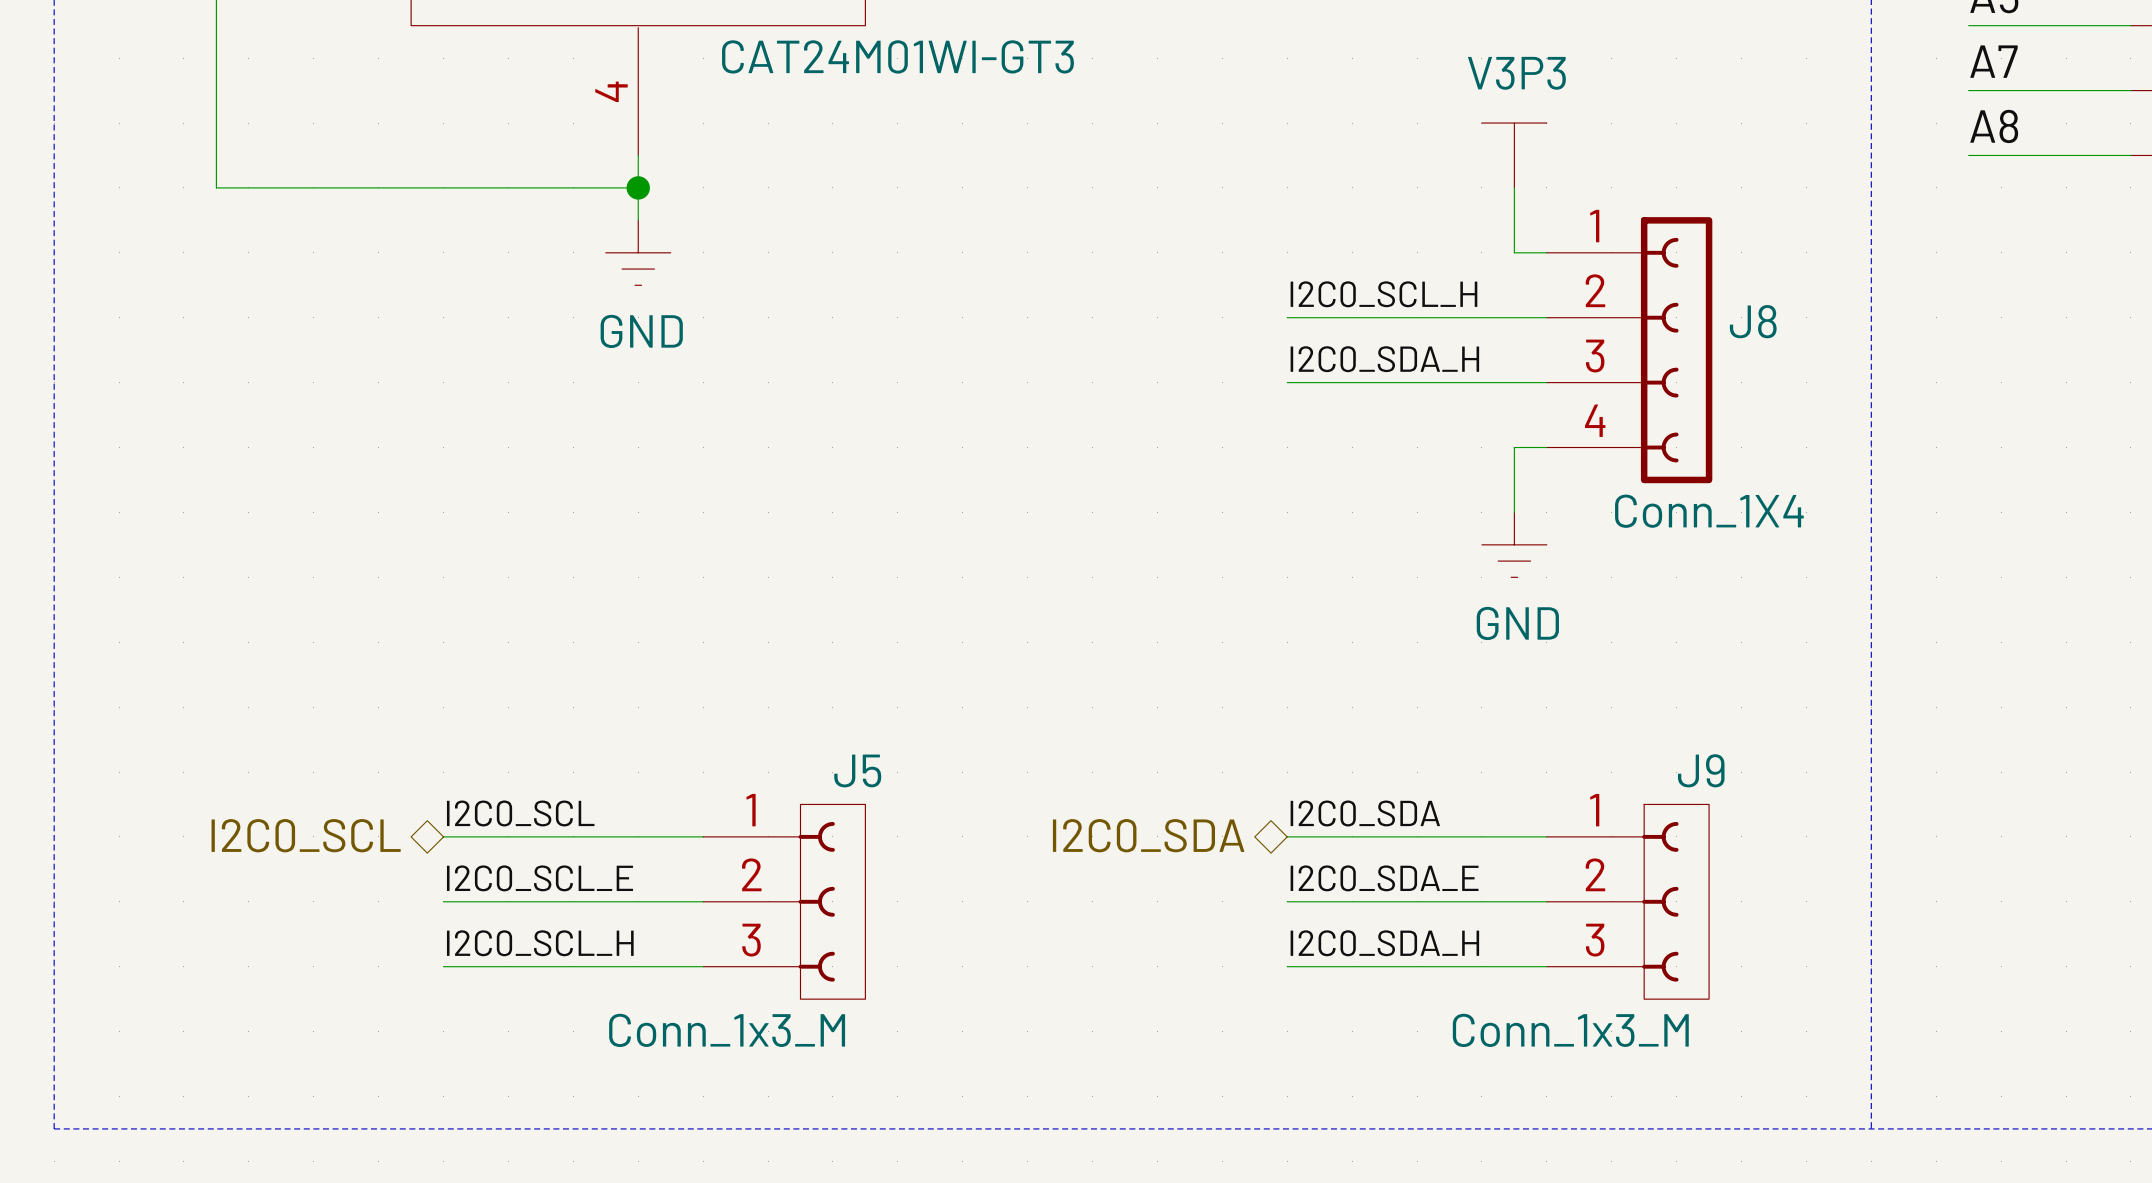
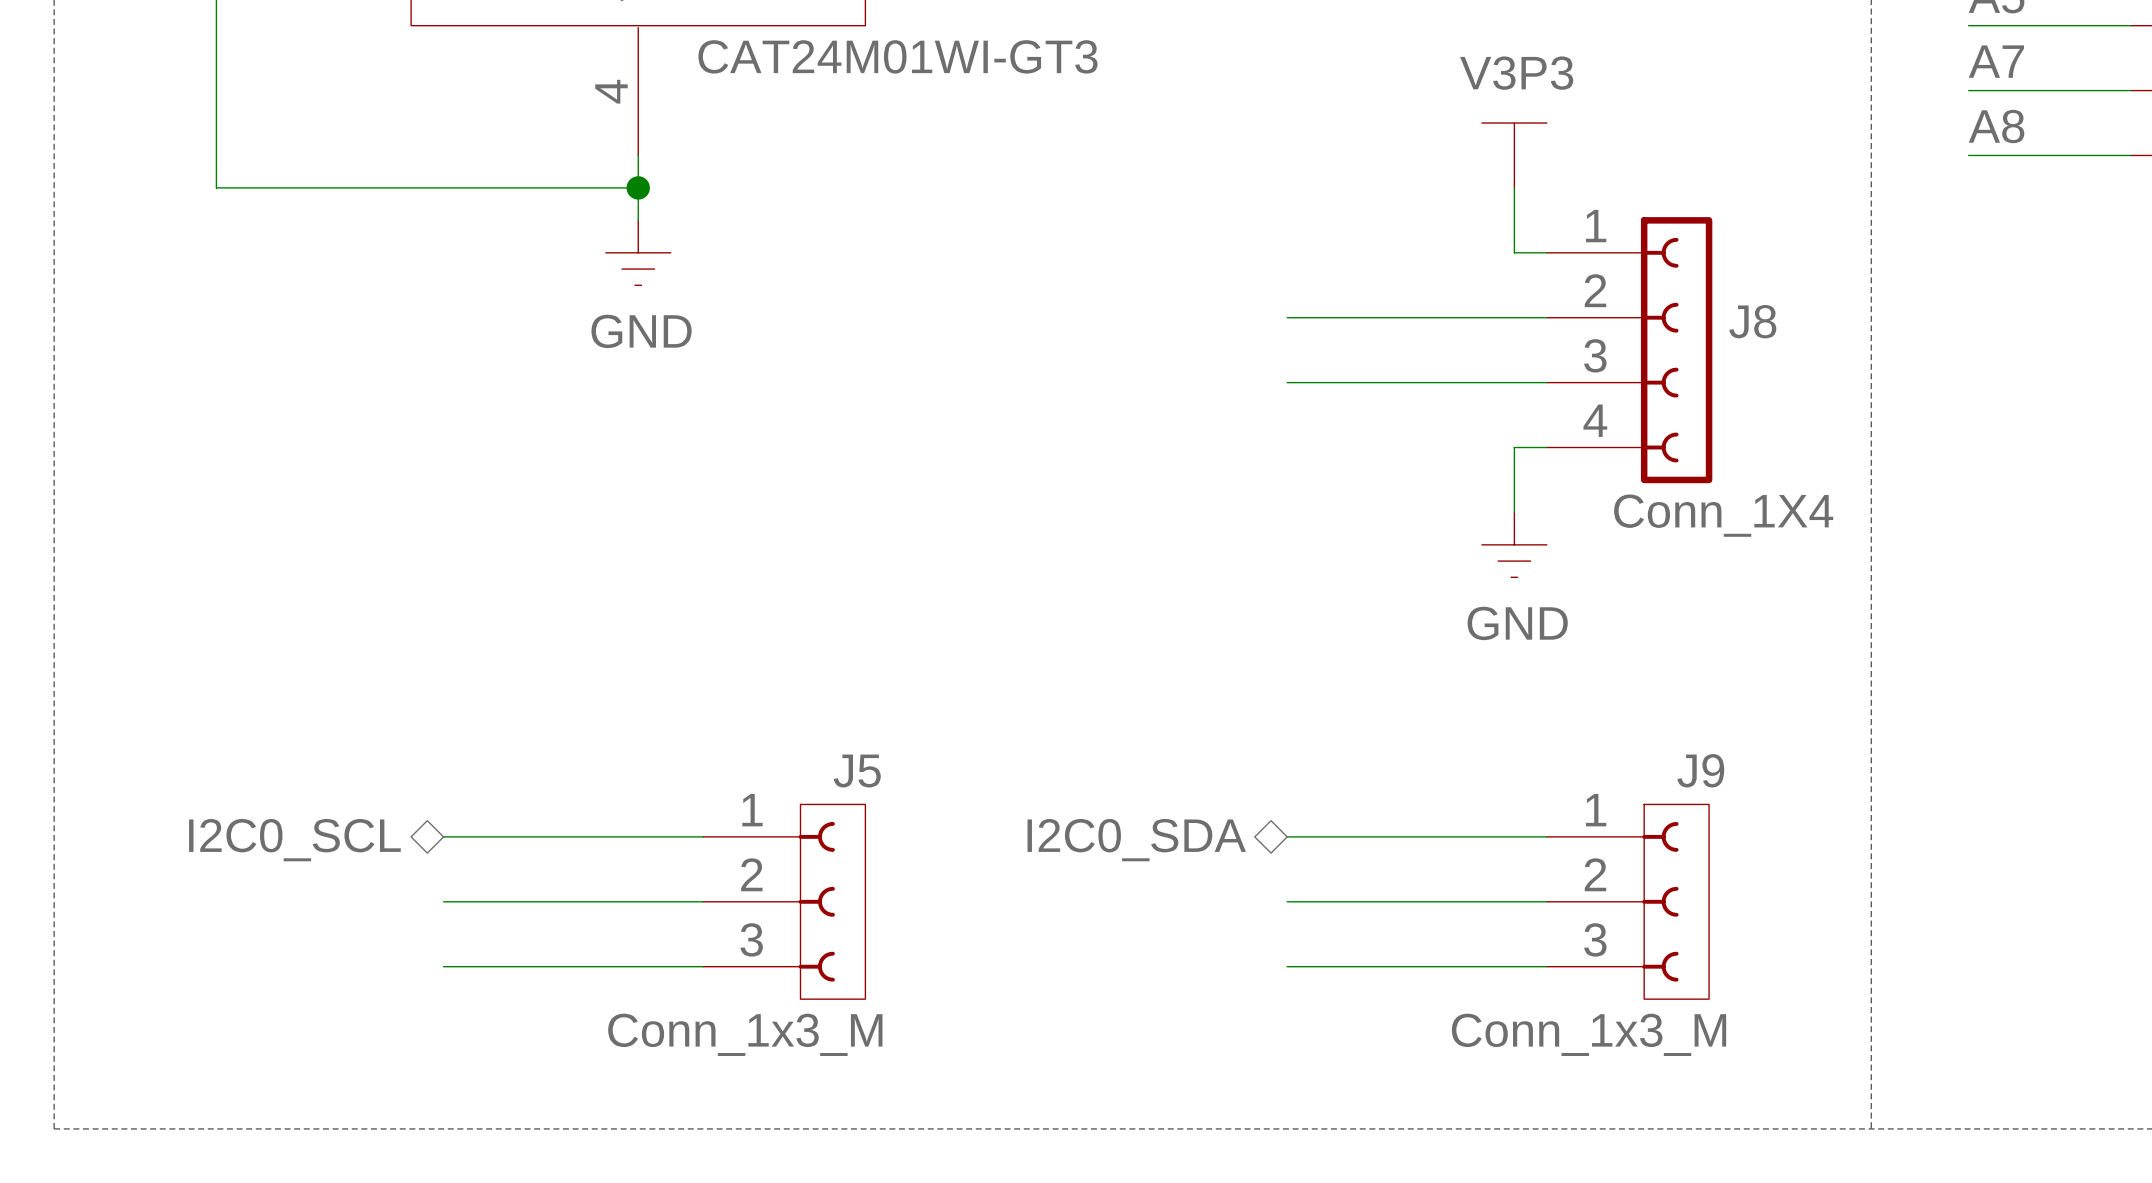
label: I2C0_SCL_H (1383, 294) -> none
label: I2C0_SDA_H (1384, 359) -> none
label: I2C0_SCL (520, 813) -> none
label: I2C0_SDA (1365, 813) -> none
label: I2C0_SCL_E (540, 878) -> none
label: I2C0_SDA_E (1384, 878) -> none
label: I2C0_SCL_H (540, 943) -> none
label: I2C0_SDA_H (1384, 943) -> none

